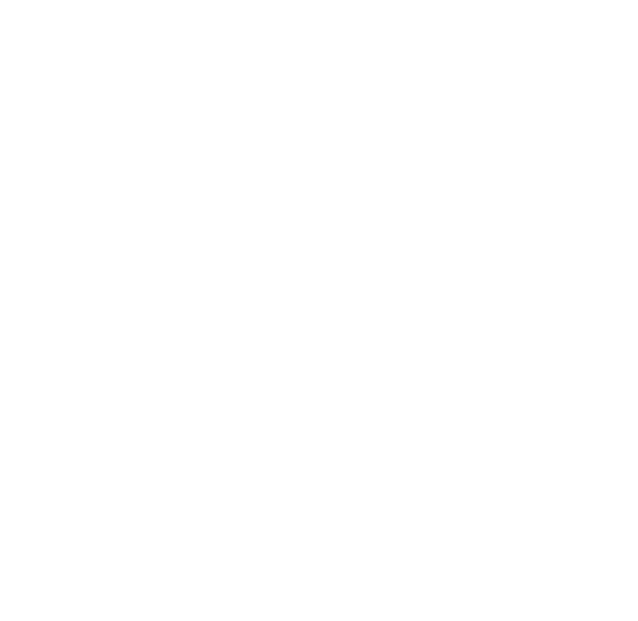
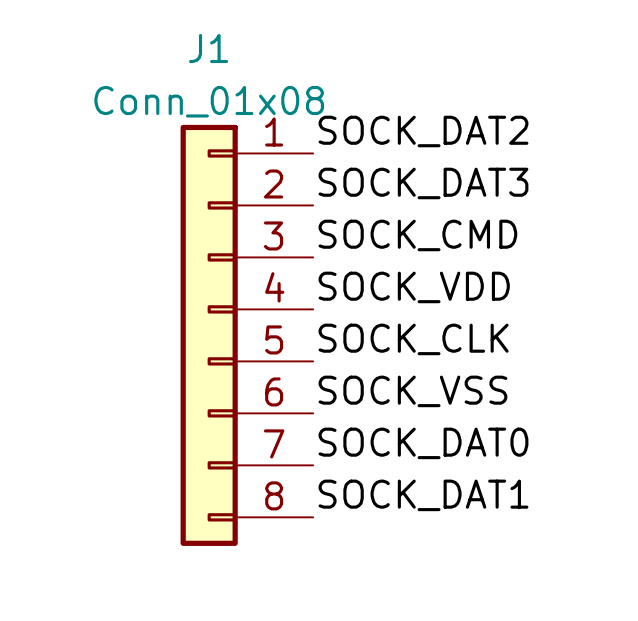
label: none -> SOCK_DAT2 (423, 131)
label: none -> SOCK_DAT3 (423, 183)
label: none -> SOCK_CMD (417, 235)
label: none -> SOCK_VDD (414, 287)
J1: none -> Conn_01x08 (246, 335)
label: none -> SOCK_CLK (413, 339)
label: none -> SOCK_VSS (412, 391)
label: none -> SOCK_DAT0 (423, 443)
label: none -> SOCK_DAT1 (423, 495)

